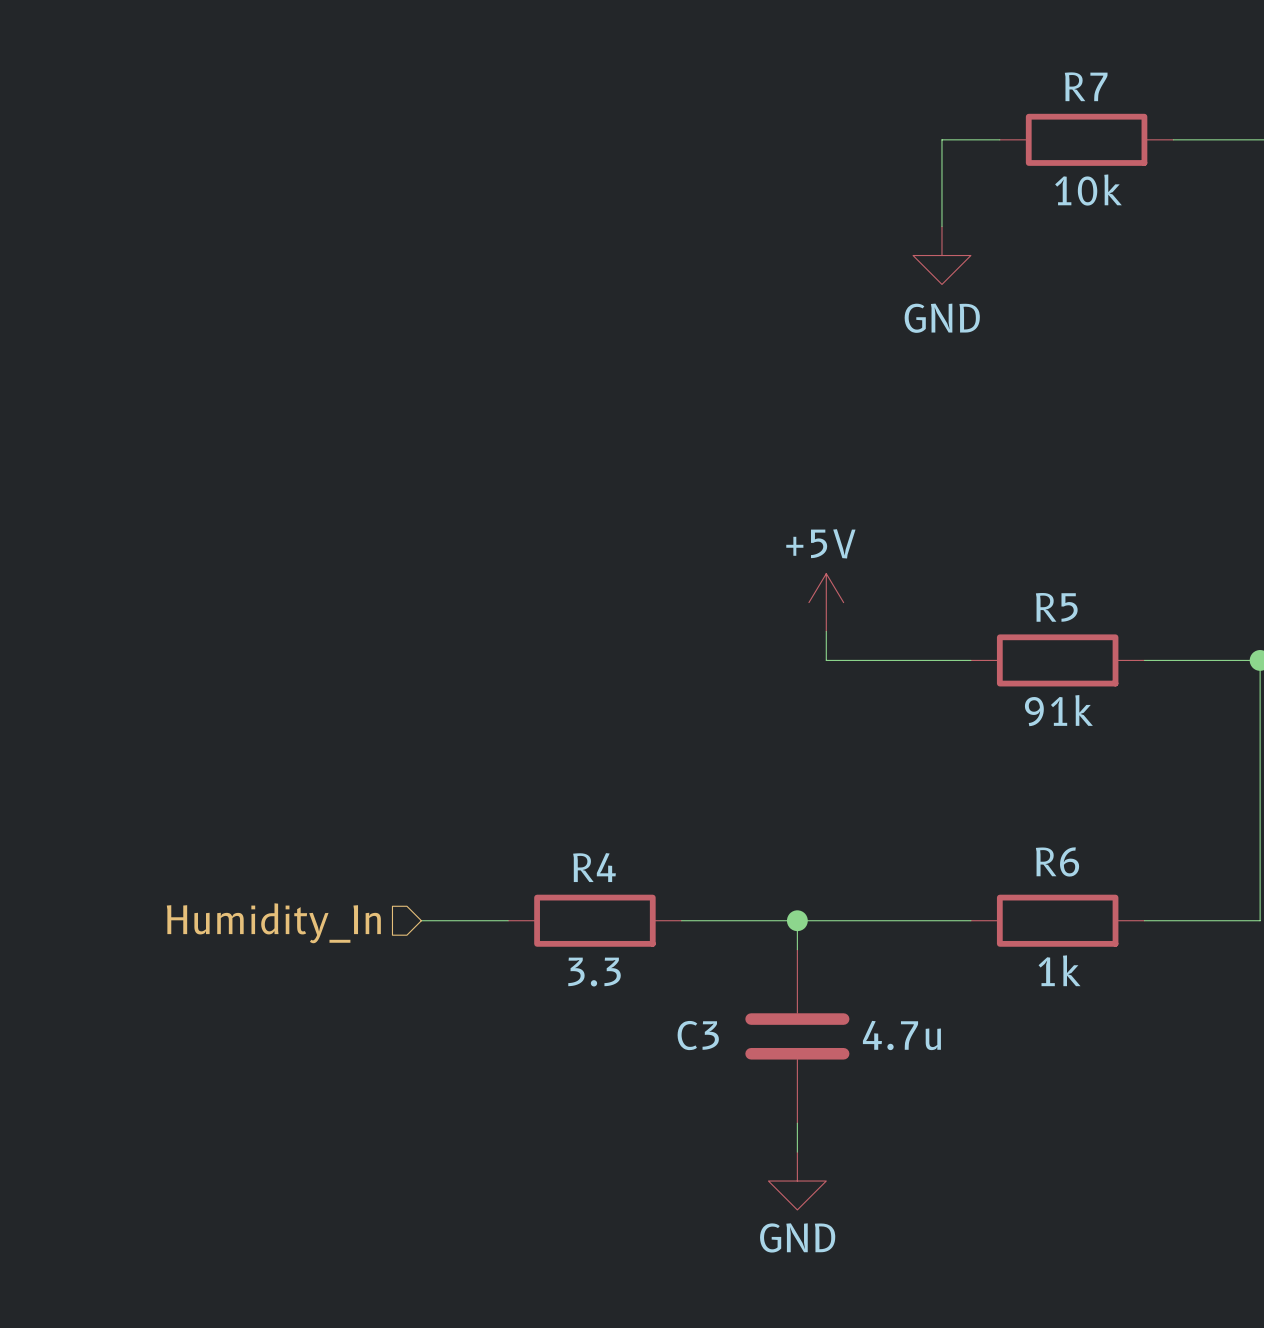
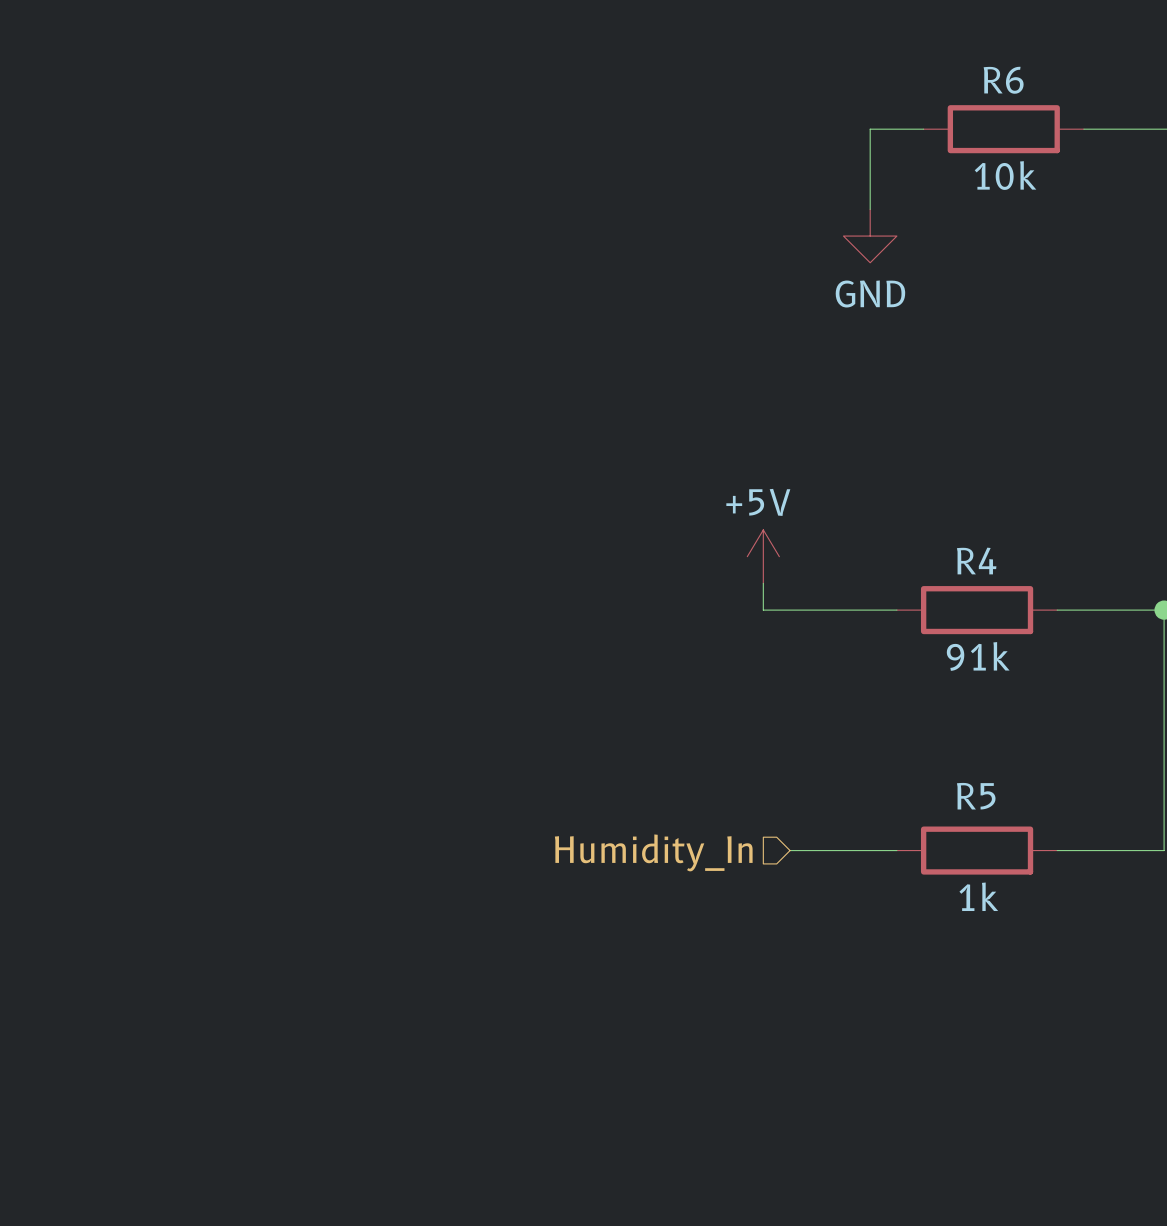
R7 name: R7 (1086, 86) -> R6 (1003, 80)
R5 name: R5 (1056, 607) -> R4 (976, 561)
R6 name: R6 (1057, 861) -> R5 (976, 796)
wire: (421, 920) (508, 920) -> none
R4: 3.3 (594, 920) -> none
wire: (681, 920) (855, 920) -> none
wire: (797, 920) (797, 949) -> none
junction: (797, 920) -> none
hierarchical label position: Humidity_In (273, 923) -> Humidity_In (653, 852)
C3: 4.7u (797, 1036) -> none
wire: (797, 1123) (797, 1152) -> none
power symbol: GND (797, 1181) -> none

